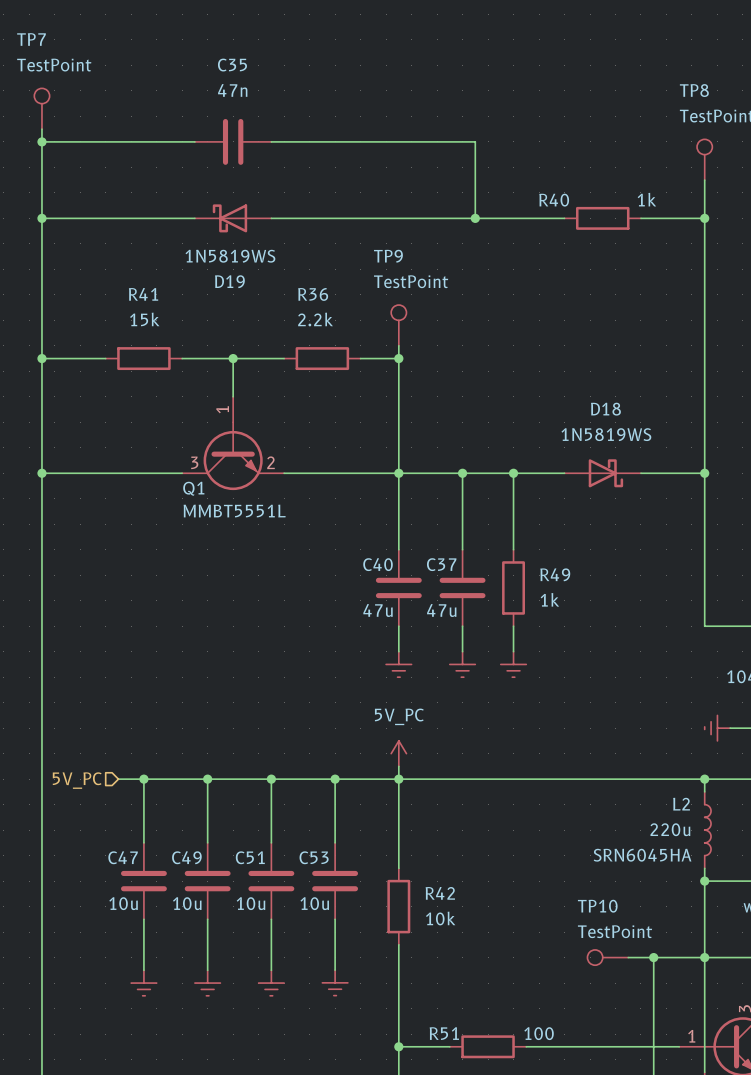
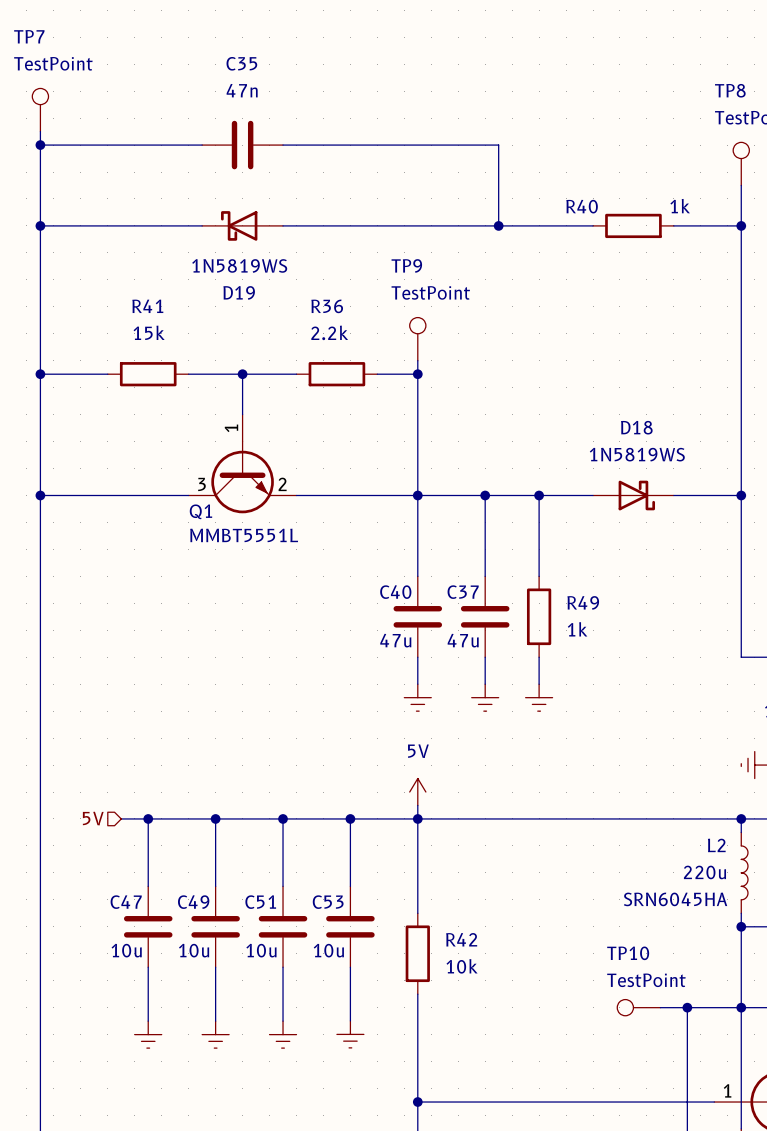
power symbol: 5V_PC (398, 753) -> 5V (417, 792)
hierarchical label: 5V_PC (77, 780) -> 5V (93, 818)
wire: none -> (471, 1102) (552, 1102)
R51: 100 (488, 1046) -> none

